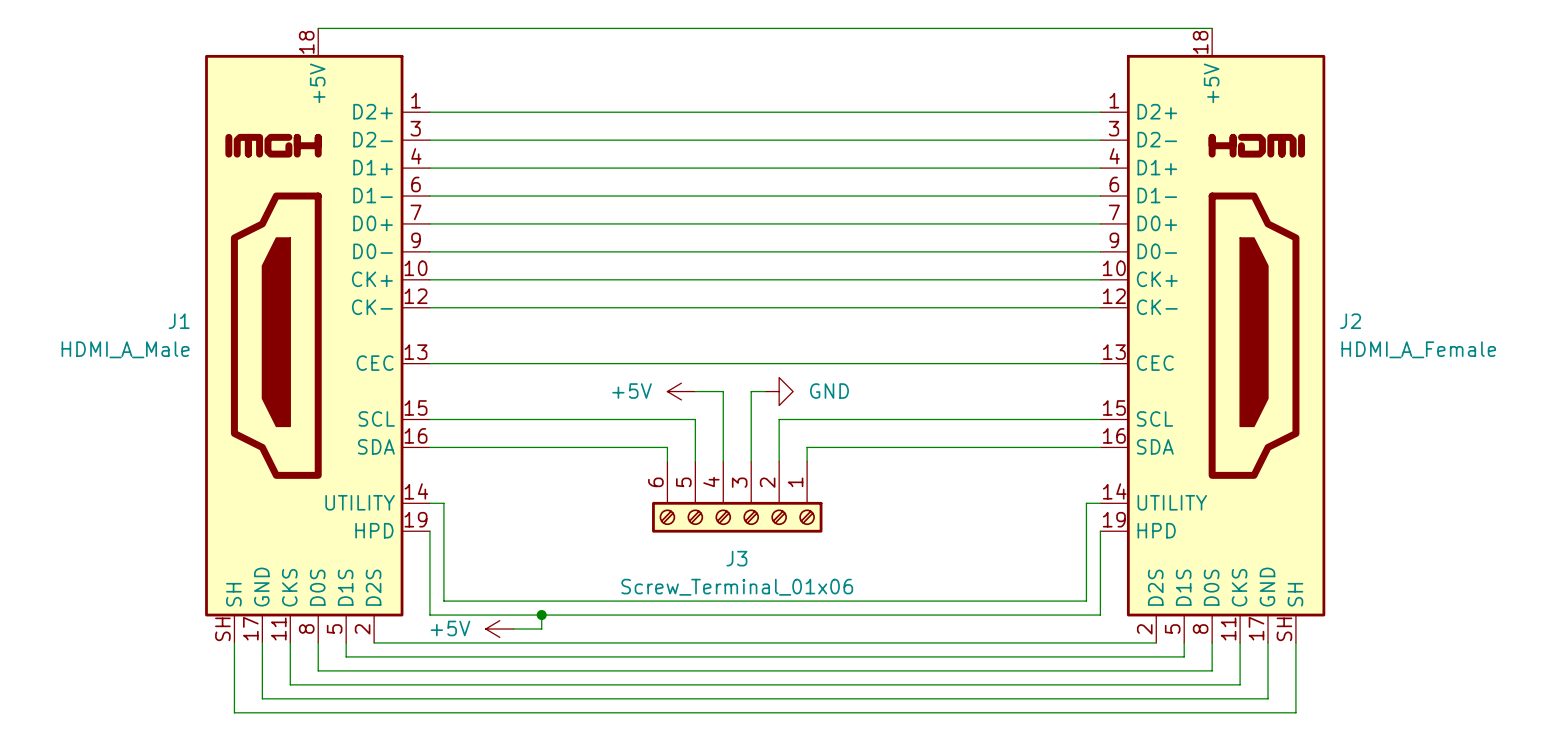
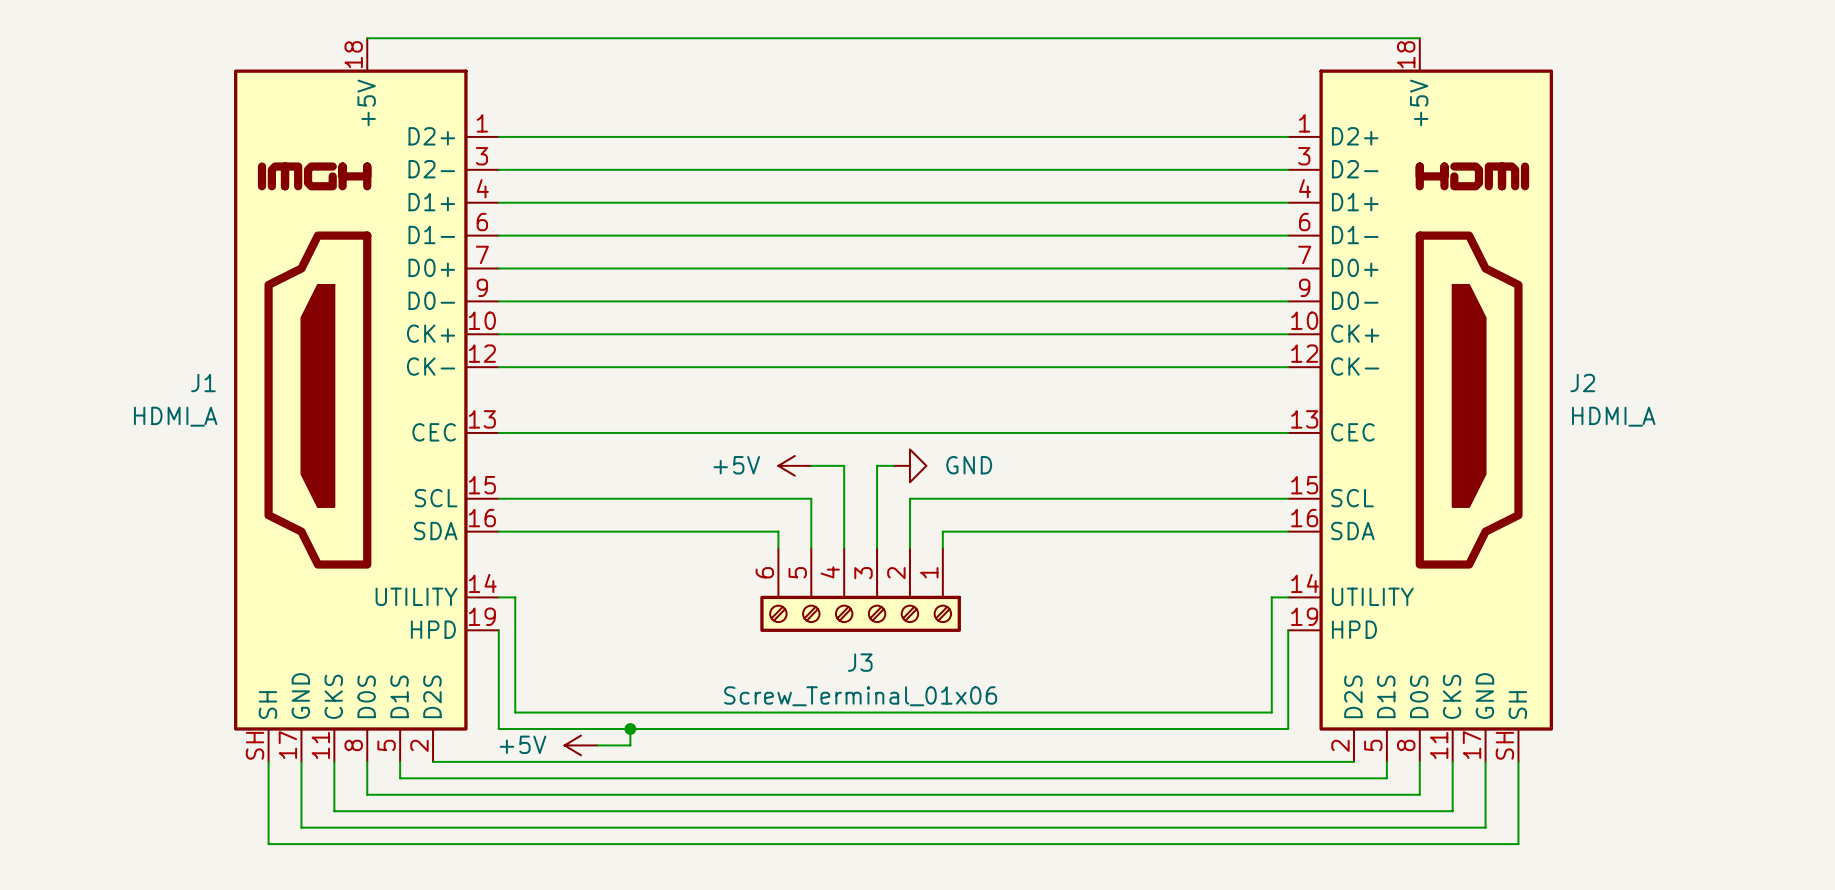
J1 value: HDMI_A_Male (125, 349) -> HDMI_A (175, 416)
J2 value: HDMI_A_Female (1418, 349) -> HDMI_A (1613, 416)

